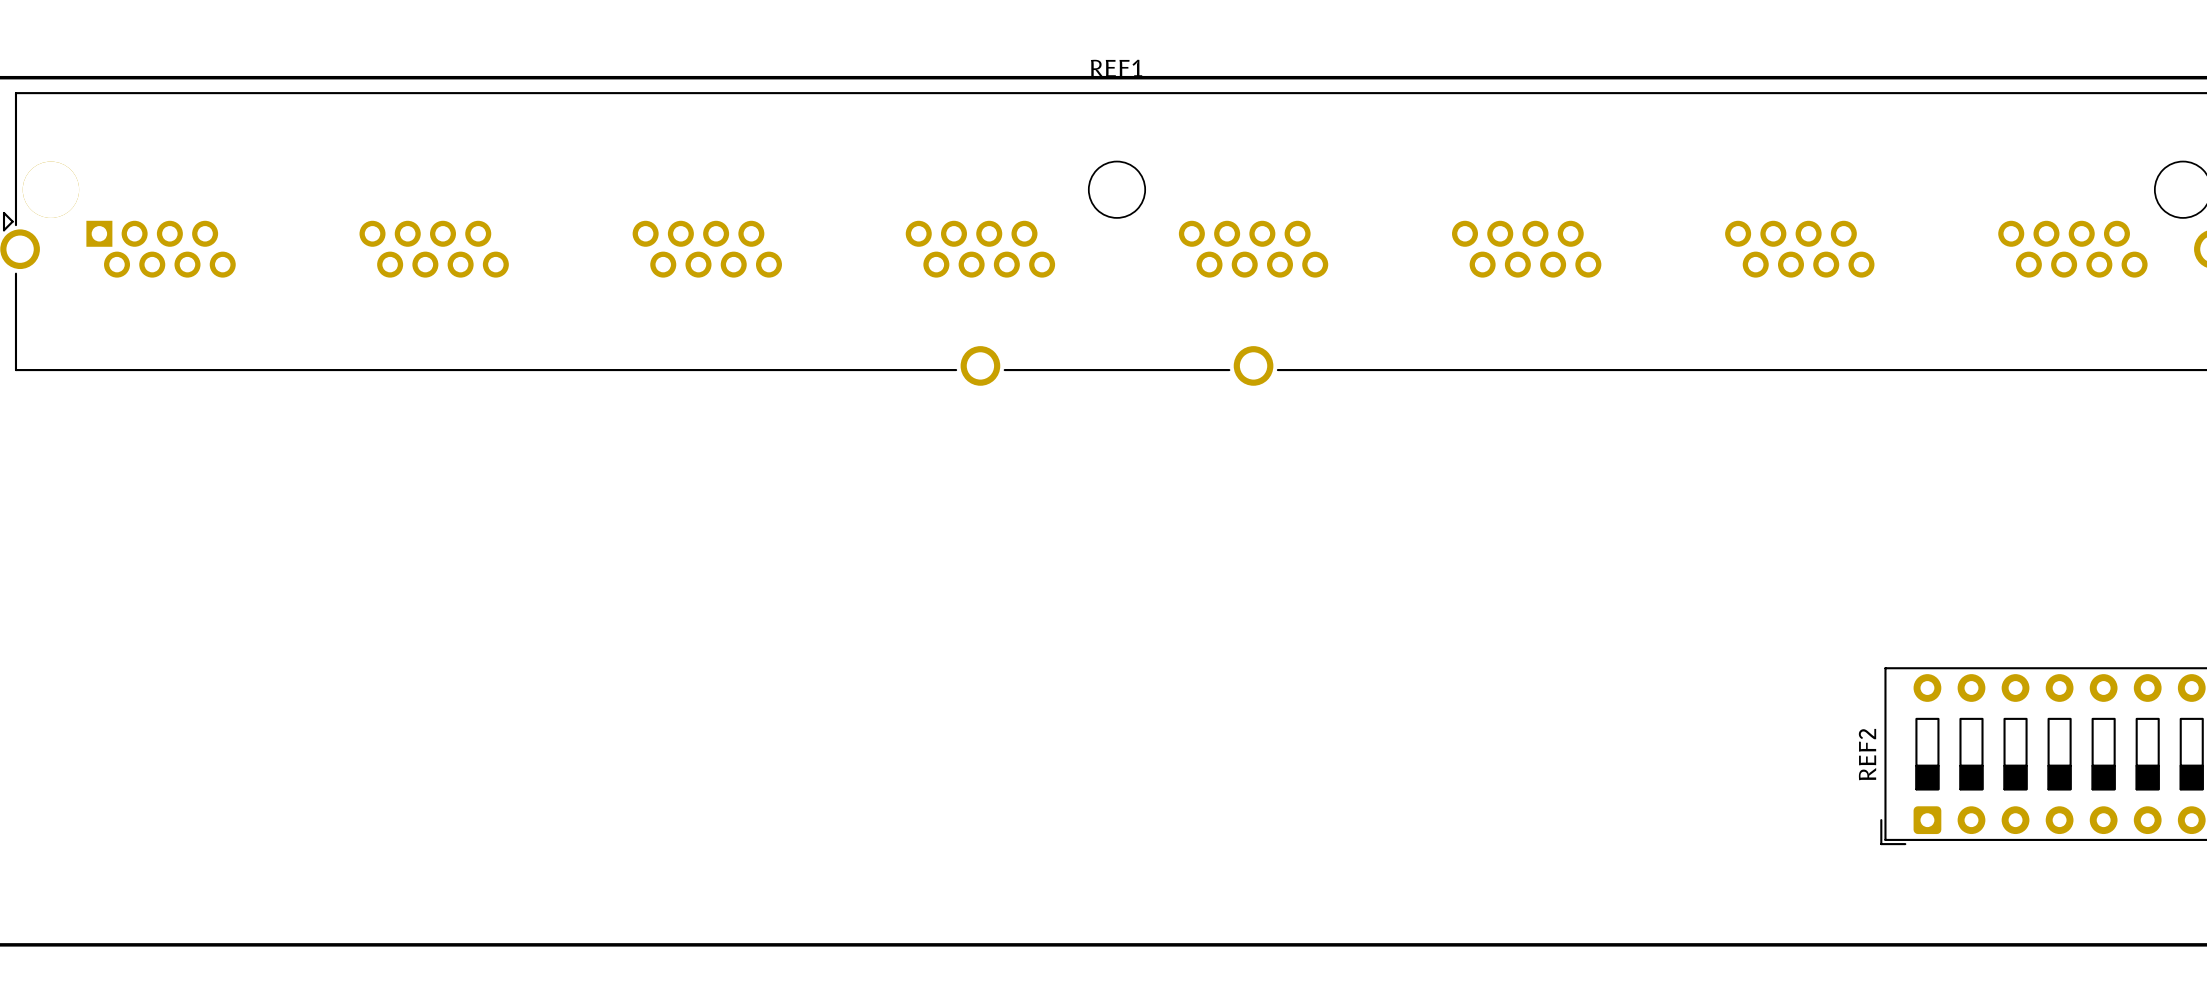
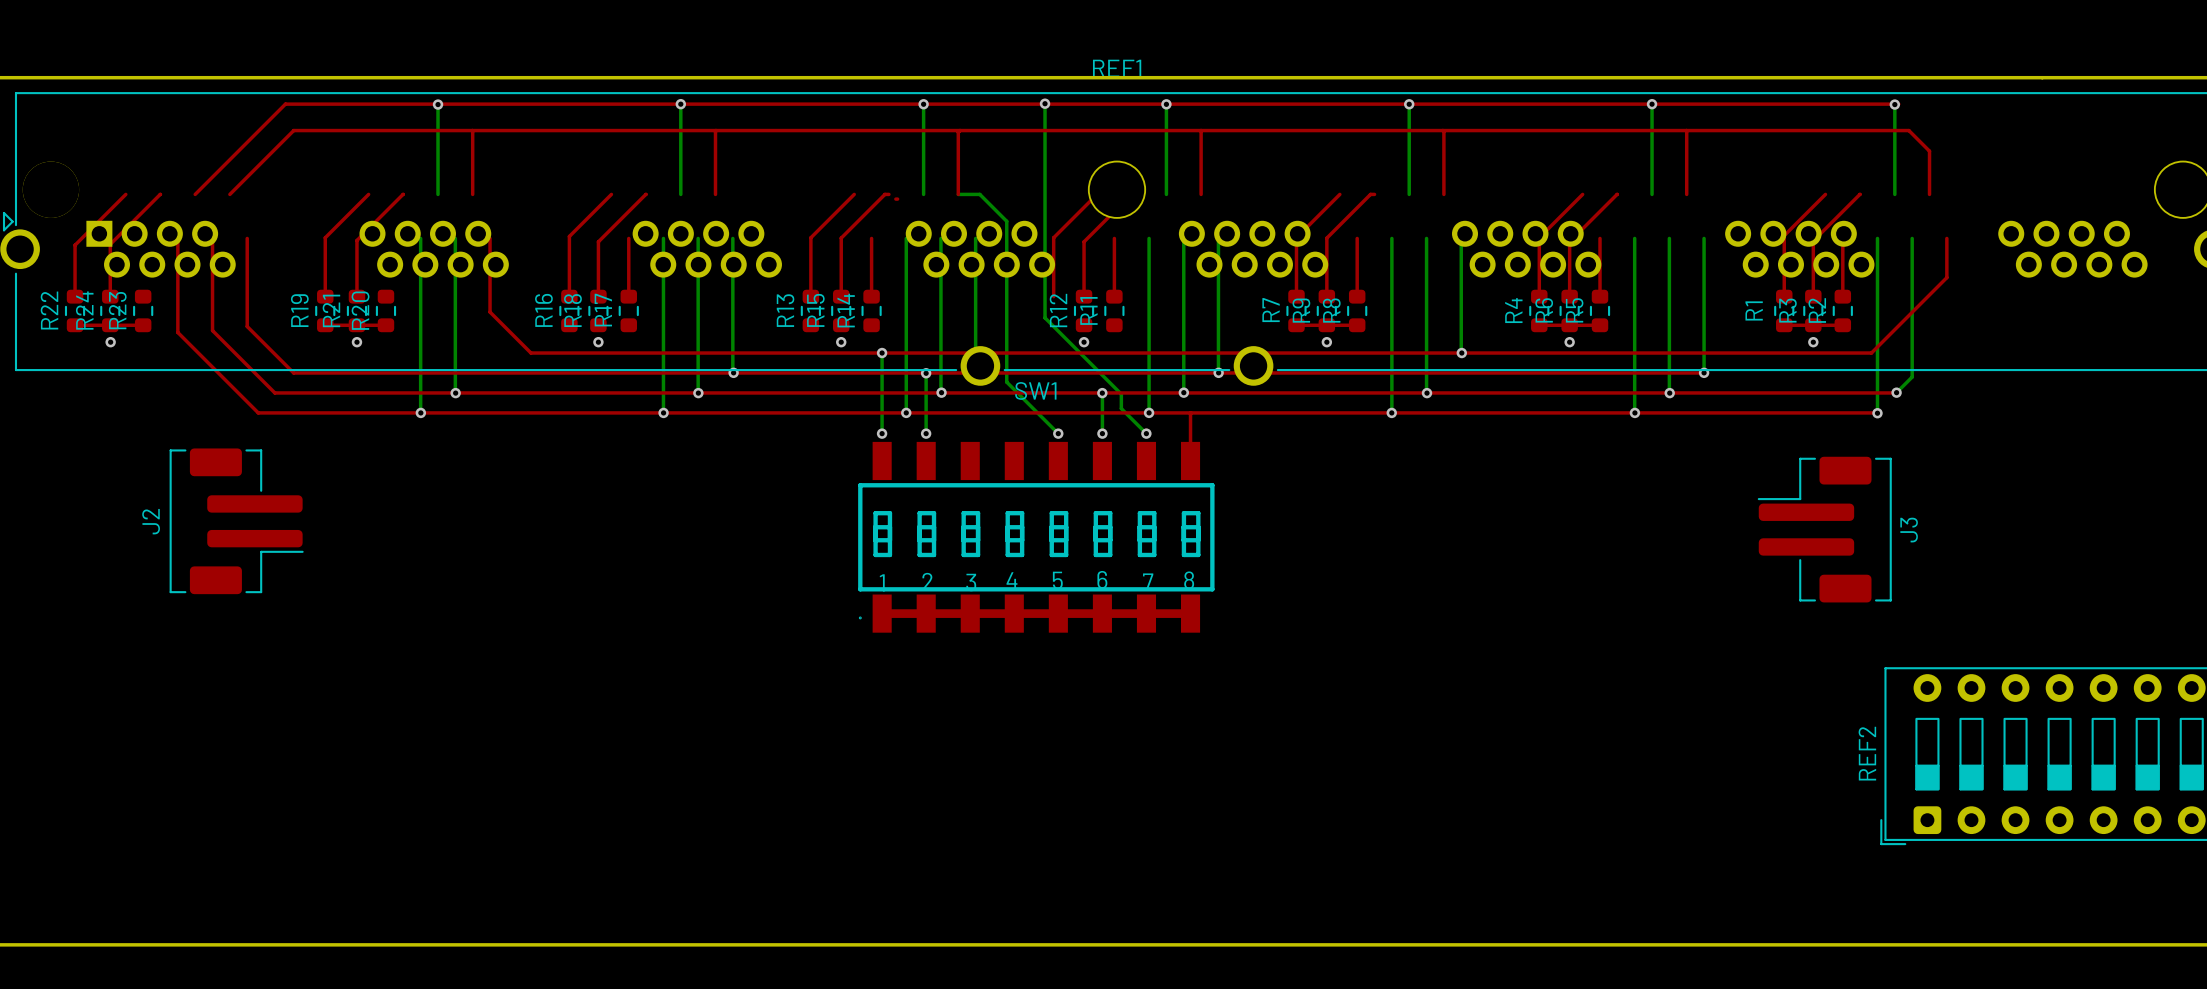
bottom track: none -> (1045, 103) (1045, 317) (1121, 394) (1121, 408) (1146, 433)
via: none -> (1045, 103)
bottom track: none -> (438, 104) (438, 194)
via: none -> (438, 104)
bottom track: none -> (680, 104) (680, 194)
via: none -> (680, 104)
bottom track: none -> (923, 104) (923, 194)
via: none -> (923, 104)
bottom track: none -> (1166, 104) (1166, 194)
via: none -> (1166, 104)
bottom track: none -> (1409, 104) (1409, 194)
via: none -> (1409, 104)
bottom track: none -> (1652, 104) (1652, 194)
via: none -> (1652, 104)
bottom track: none -> (1894, 104) (1894, 194)
via: none -> (1894, 104)
top track: none -> (1898, 104) (285, 104) (195, 194)
top track: none -> (472, 130) (472, 194)
top track: none -> (715, 130) (715, 194)
top track: none -> (960, 130) (958, 132) (958, 194)
top track: none -> (1201, 130) (1201, 194)
top track: none -> (1442, 130) (1443, 194)
top track: none -> (1686, 130) (1686, 194)
top track: none -> (125, 194) (75, 245) (75, 296)
top track: none -> (160, 194) (110, 244) (110, 296)
top track: none -> (229, 194) (293, 130) (1908, 130) (1929, 151) (1929, 194)
top track: none -> (368, 194) (325, 237) (325, 296)
top track: none -> (403, 194) (356, 240) (356, 296)
top track: none -> (611, 194) (569, 236) (569, 296)
top track: none -> (645, 194) (598, 241) (598, 296)
top track: none -> (854, 194) (810, 237) (810, 296)
top track: none -> (888, 194) (884, 194) (841, 238) (841, 296)
bottom track: none -> (958, 194) (979, 194) (1006, 221) (1006, 382) (1058, 433)
top track: none -> (1097, 194) (1053, 237) (1053, 296)
top track: none -> (1131, 194) (1084, 241) (1084, 296)
top track: none -> (1339, 194) (1296, 237) (1296, 296)
top track: none -> (1374, 194) (1370, 194) (1326, 238) (1326, 296)
top track: none -> (1582, 194) (1539, 237) (1539, 296)
top track: none -> (1617, 194) (1569, 241) (1569, 296)
top track: none -> (1825, 194) (1784, 235) (1784, 296)
top track: none -> (1859, 194) (1813, 240) (1813, 296)
top track: none -> (895, 199) (897, 199)
top track: none -> (177, 238) (177, 332) (258, 412) (1877, 413)
top track: none -> (212, 238) (212, 330) (274, 392) (1898, 392)
top track: none -> (247, 238) (247, 326) (293, 372) (1703, 372)
bottom track: none -> (420, 238) (420, 412)
bottom track: none -> (455, 238) (455, 393)
top track: none -> (490, 238) (490, 312) (530, 353) (1871, 353) (1946, 277) (1946, 238)
top track: none -> (628, 238) (628, 296)
bottom track: none -> (663, 238) (663, 412)
bottom track: none -> (698, 238) (698, 392)
bottom track: none -> (732, 238) (733, 372)
top track: none -> (871, 238) (871, 296)
bottom track: none -> (906, 238) (906, 412)
bottom track: none -> (940, 238) (941, 392)
bottom track: none -> (975, 238) (975, 353)
top track: none -> (1114, 238) (1114, 296)
bottom track: none -> (1149, 238) (1149, 412)
bottom track: none -> (1183, 238) (1183, 392)
bottom track: none -> (1218, 238) (1218, 372)
top track: none -> (1357, 238) (1357, 296)
bottom track: none -> (1391, 238) (1391, 412)
bottom track: none -> (1426, 238) (1426, 393)
bottom track: none -> (1461, 238) (1461, 353)
top track: none -> (1600, 238) (1600, 296)
bottom track: none -> (1634, 238) (1634, 412)
bottom track: none -> (1669, 238) (1669, 393)
bottom track: none -> (1704, 238) (1704, 372)
top track: none -> (1842, 238) (1842, 296)
bottom track: none -> (1877, 238) (1877, 413)
bottom track: none -> (1912, 238) (1912, 377) (1896, 392)
R22: none -> (75, 310)
R24: none -> (110, 310)
R23: none -> (143, 310)
R19: none -> (325, 310)
R21: none -> (356, 310)
R20: none -> (385, 310)
R16: none -> (569, 310)
R18: none -> (598, 310)
R17: none -> (628, 310)
R13: none -> (810, 310)
R15: none -> (841, 310)
R14: none -> (871, 310)
R12: none -> (1084, 310)
R11: none -> (1114, 310)
R7: none -> (1296, 310)
R9: none -> (1326, 310)
R8: none -> (1357, 310)
R4: none -> (1539, 310)
R6: none -> (1569, 310)
R5: none -> (1600, 310)
R1: none -> (1784, 310)
R3: none -> (1813, 310)
R2: none -> (1842, 310)
top track: none -> (75, 325) (143, 325)
top track: none -> (325, 325) (385, 325)
top track: none -> (1296, 325) (1357, 325)
top track: none -> (1539, 325) (1600, 325)
top track: none -> (1784, 325) (1843, 325)
via: none -> (110, 342)
via: none -> (356, 342)
via: none -> (598, 342)
via: none -> (841, 342)
via: none -> (1084, 342)
via: none -> (1326, 342)
via: none -> (1569, 342)
via: none -> (1813, 342)
bottom track: none -> (882, 353) (882, 432)
via: none -> (882, 353)
via: none -> (1461, 353)
via: none -> (733, 372)
via: none -> (1218, 372)
via: none -> (1704, 372)
bottom track: none -> (926, 373) (926, 433)
via: none -> (926, 373)
via: none -> (941, 392)
via: none -> (1183, 392)
via: none -> (1896, 392)
via: none -> (455, 393)
via: none -> (698, 393)
bottom track: none -> (1102, 393) (1102, 433)
via: none -> (1102, 393)
via: none -> (1426, 393)
via: none -> (1669, 393)
via: none -> (420, 412)
via: none -> (663, 412)
via: none -> (906, 412)
via: none -> (1149, 412)
top track: none -> (1190, 412) (1190, 460)
via: none -> (1391, 412)
via: none -> (1634, 412)
via: none -> (1877, 413)
via: none -> (882, 433)
via: none -> (926, 433)
via: none -> (1058, 433)
via: none -> (1102, 433)
via: none -> (1146, 433)
J2: none -> (236, 521)
J3: none -> (1824, 529)
SW1: none -> (1036, 537)
top track: none -> (882, 613) (1190, 613)

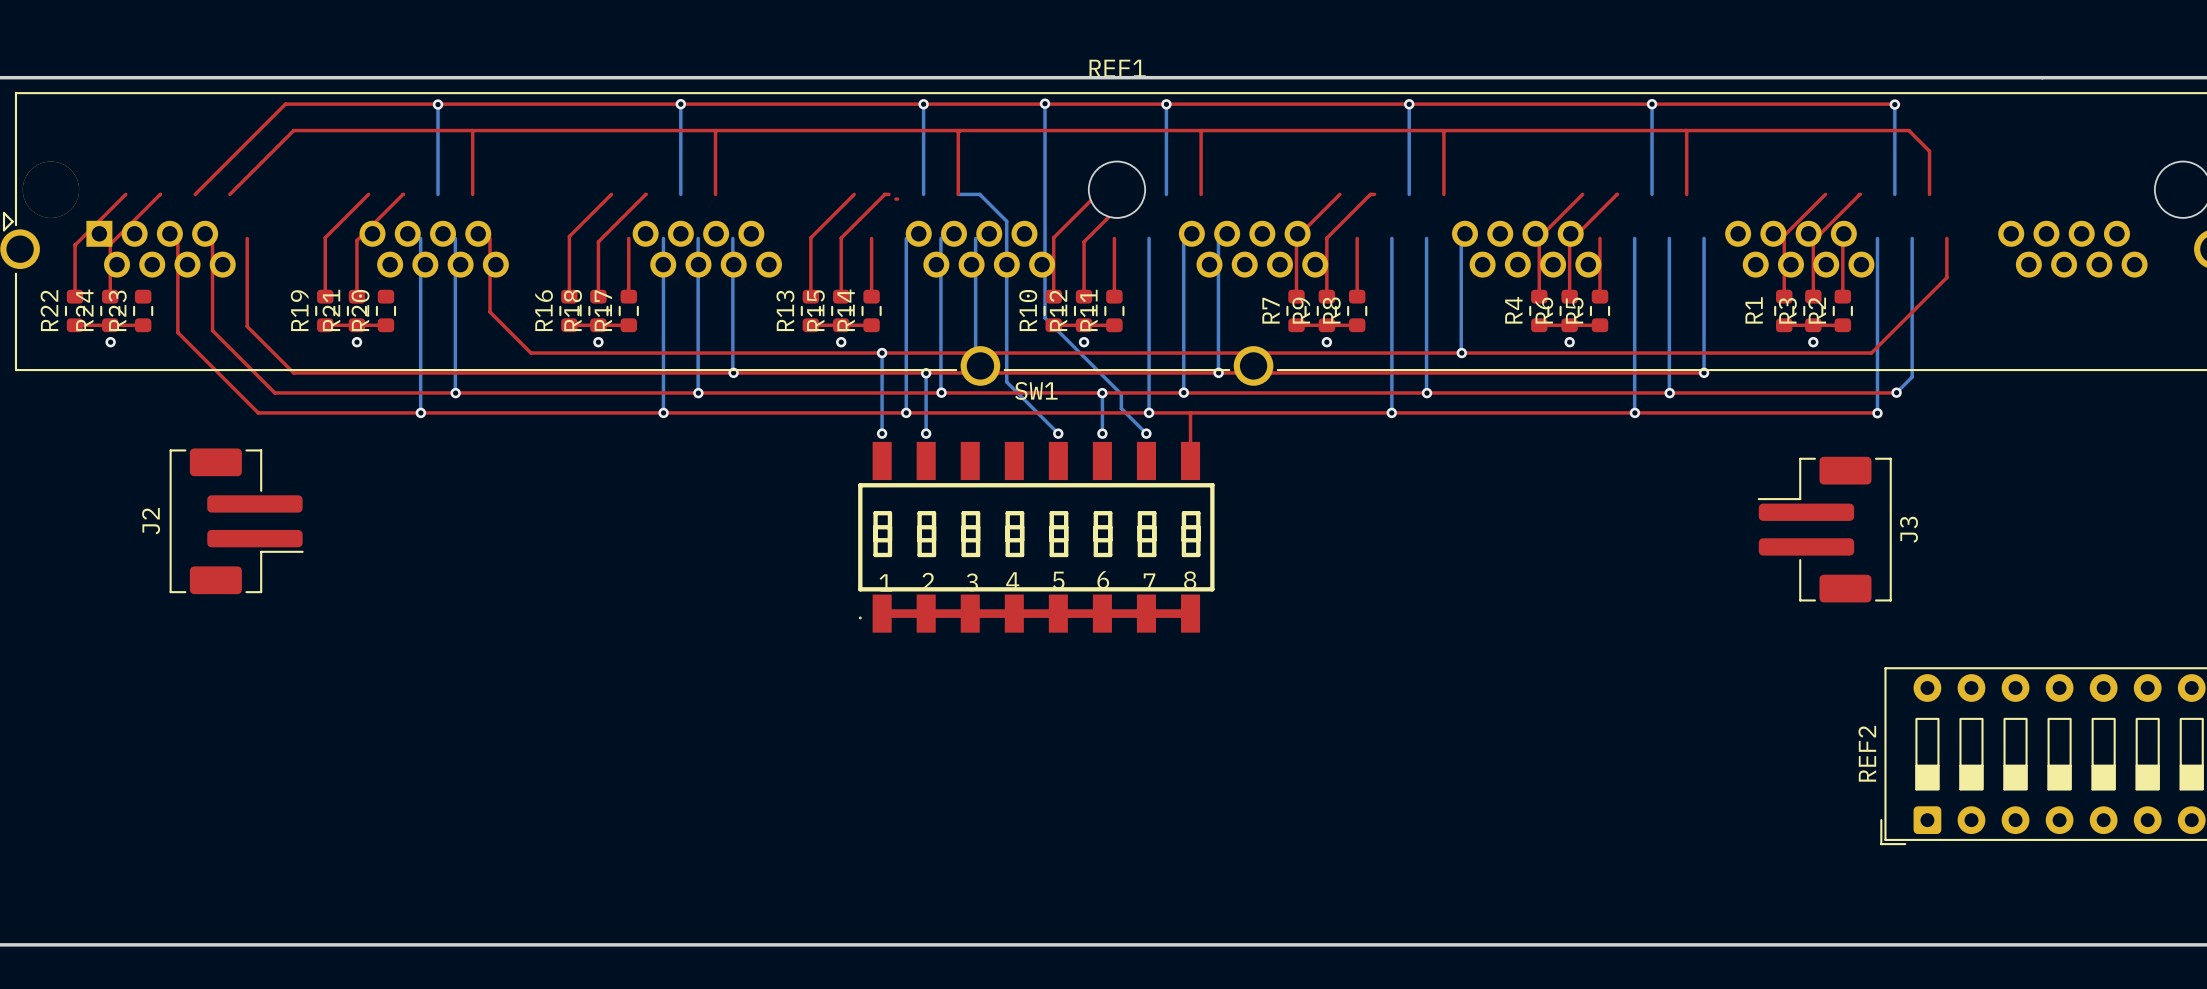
R10: none -> (1053, 310)
top track: none -> (569, 325) (628, 325)
top track: none -> (810, 325) (871, 325)
top track: none -> (1053, 325) (1114, 325)

